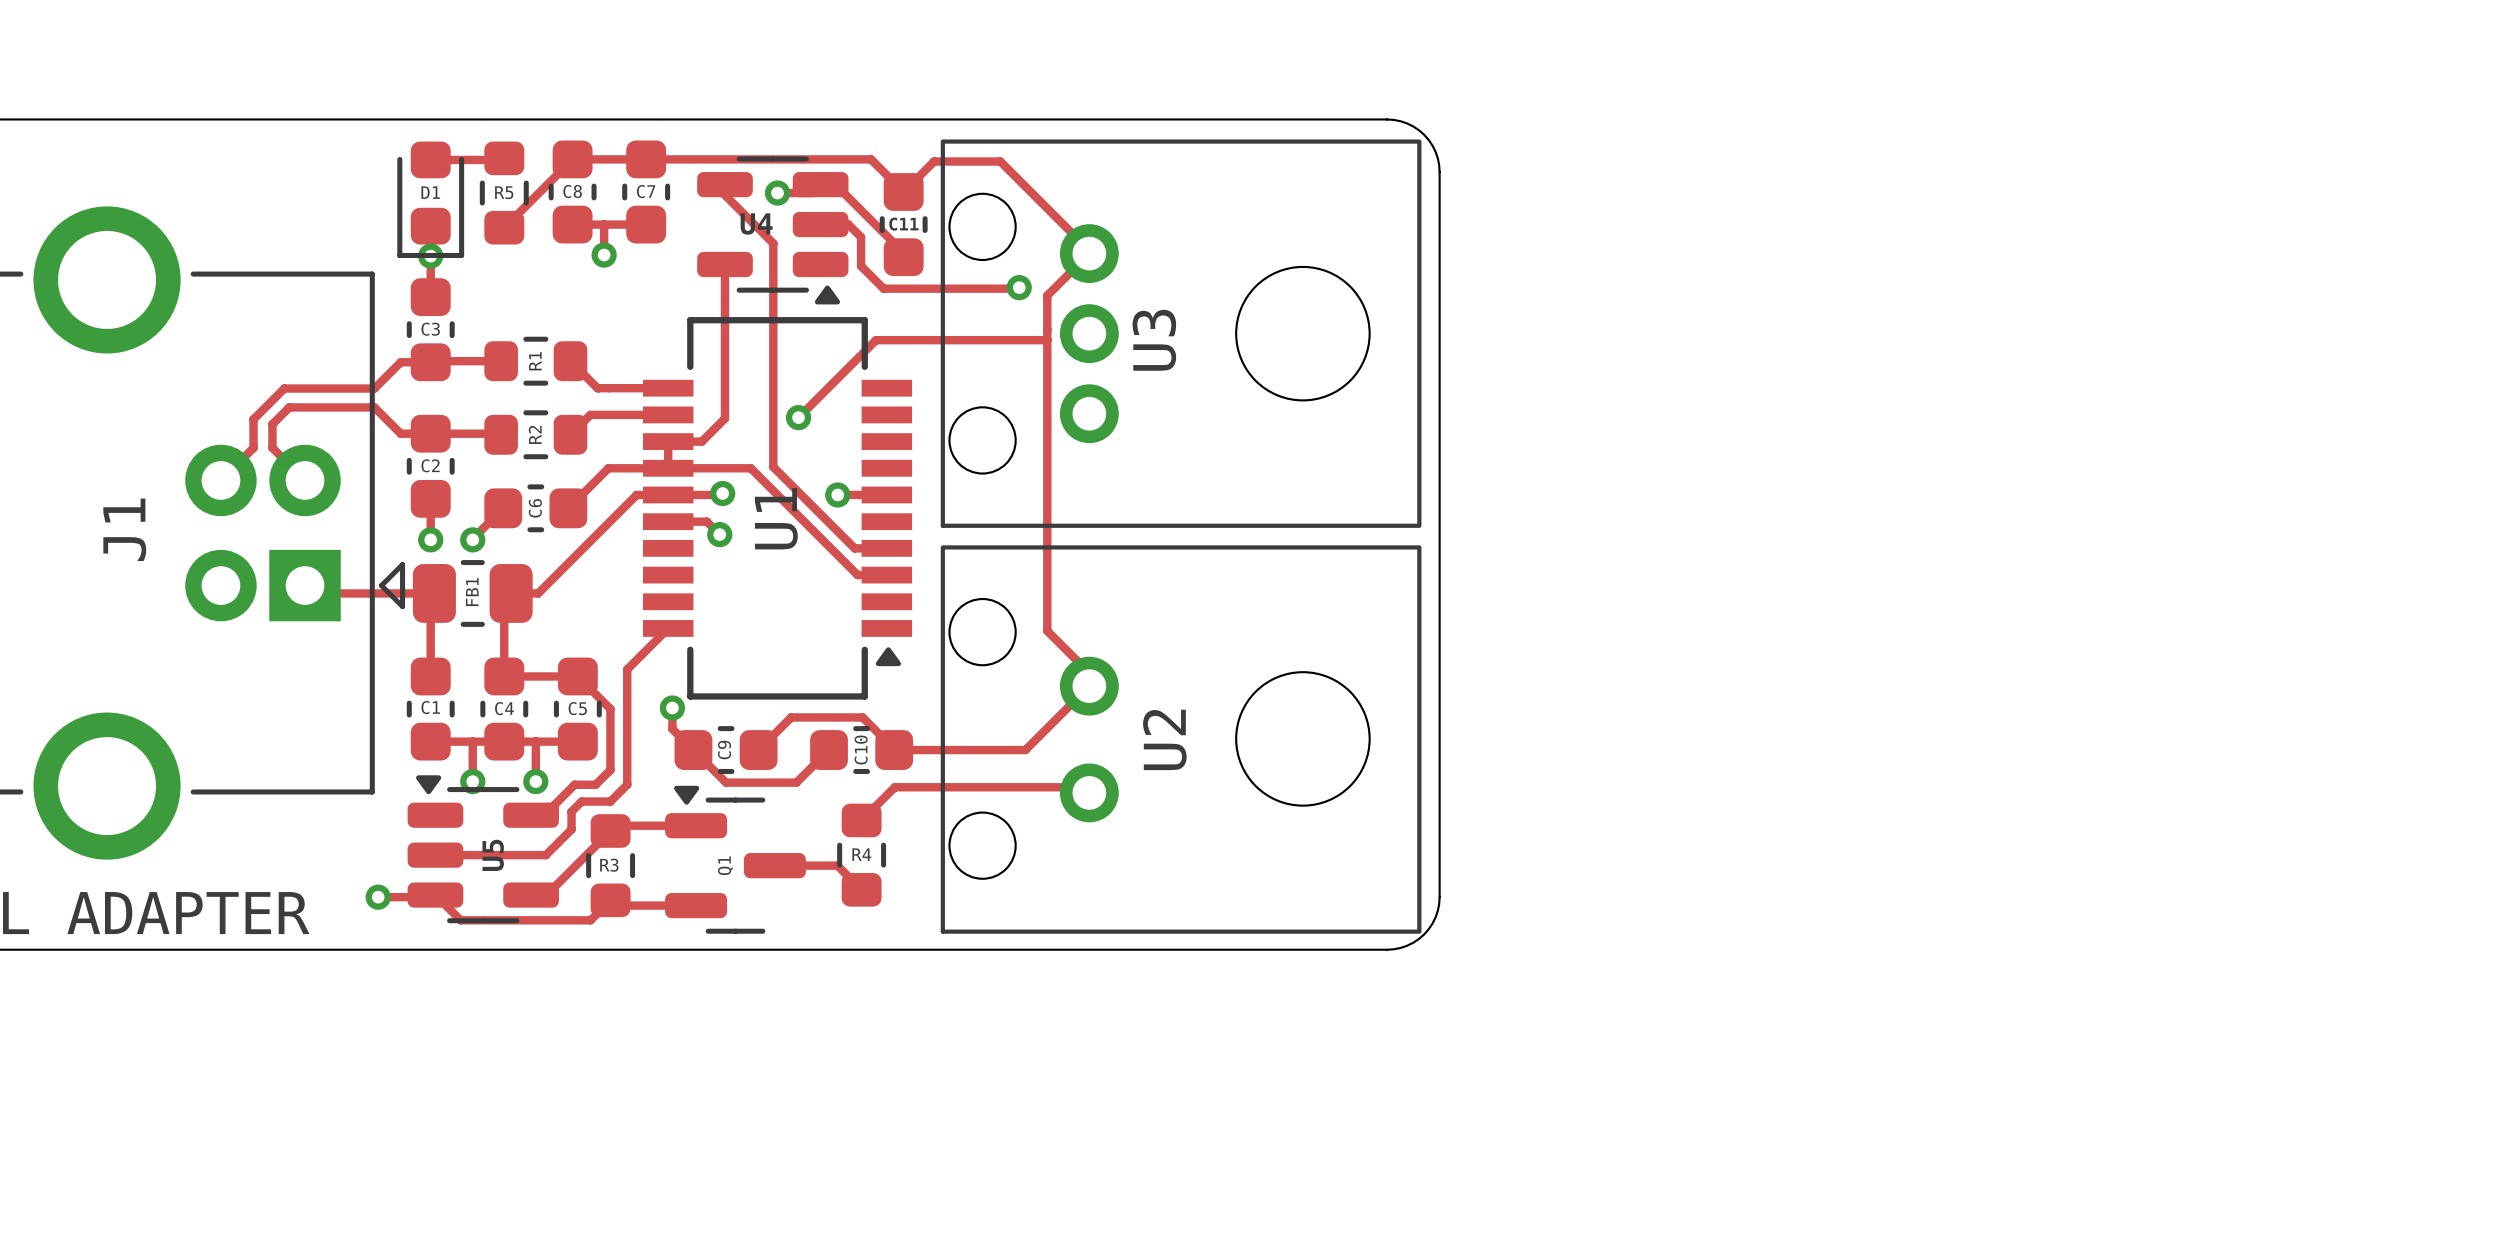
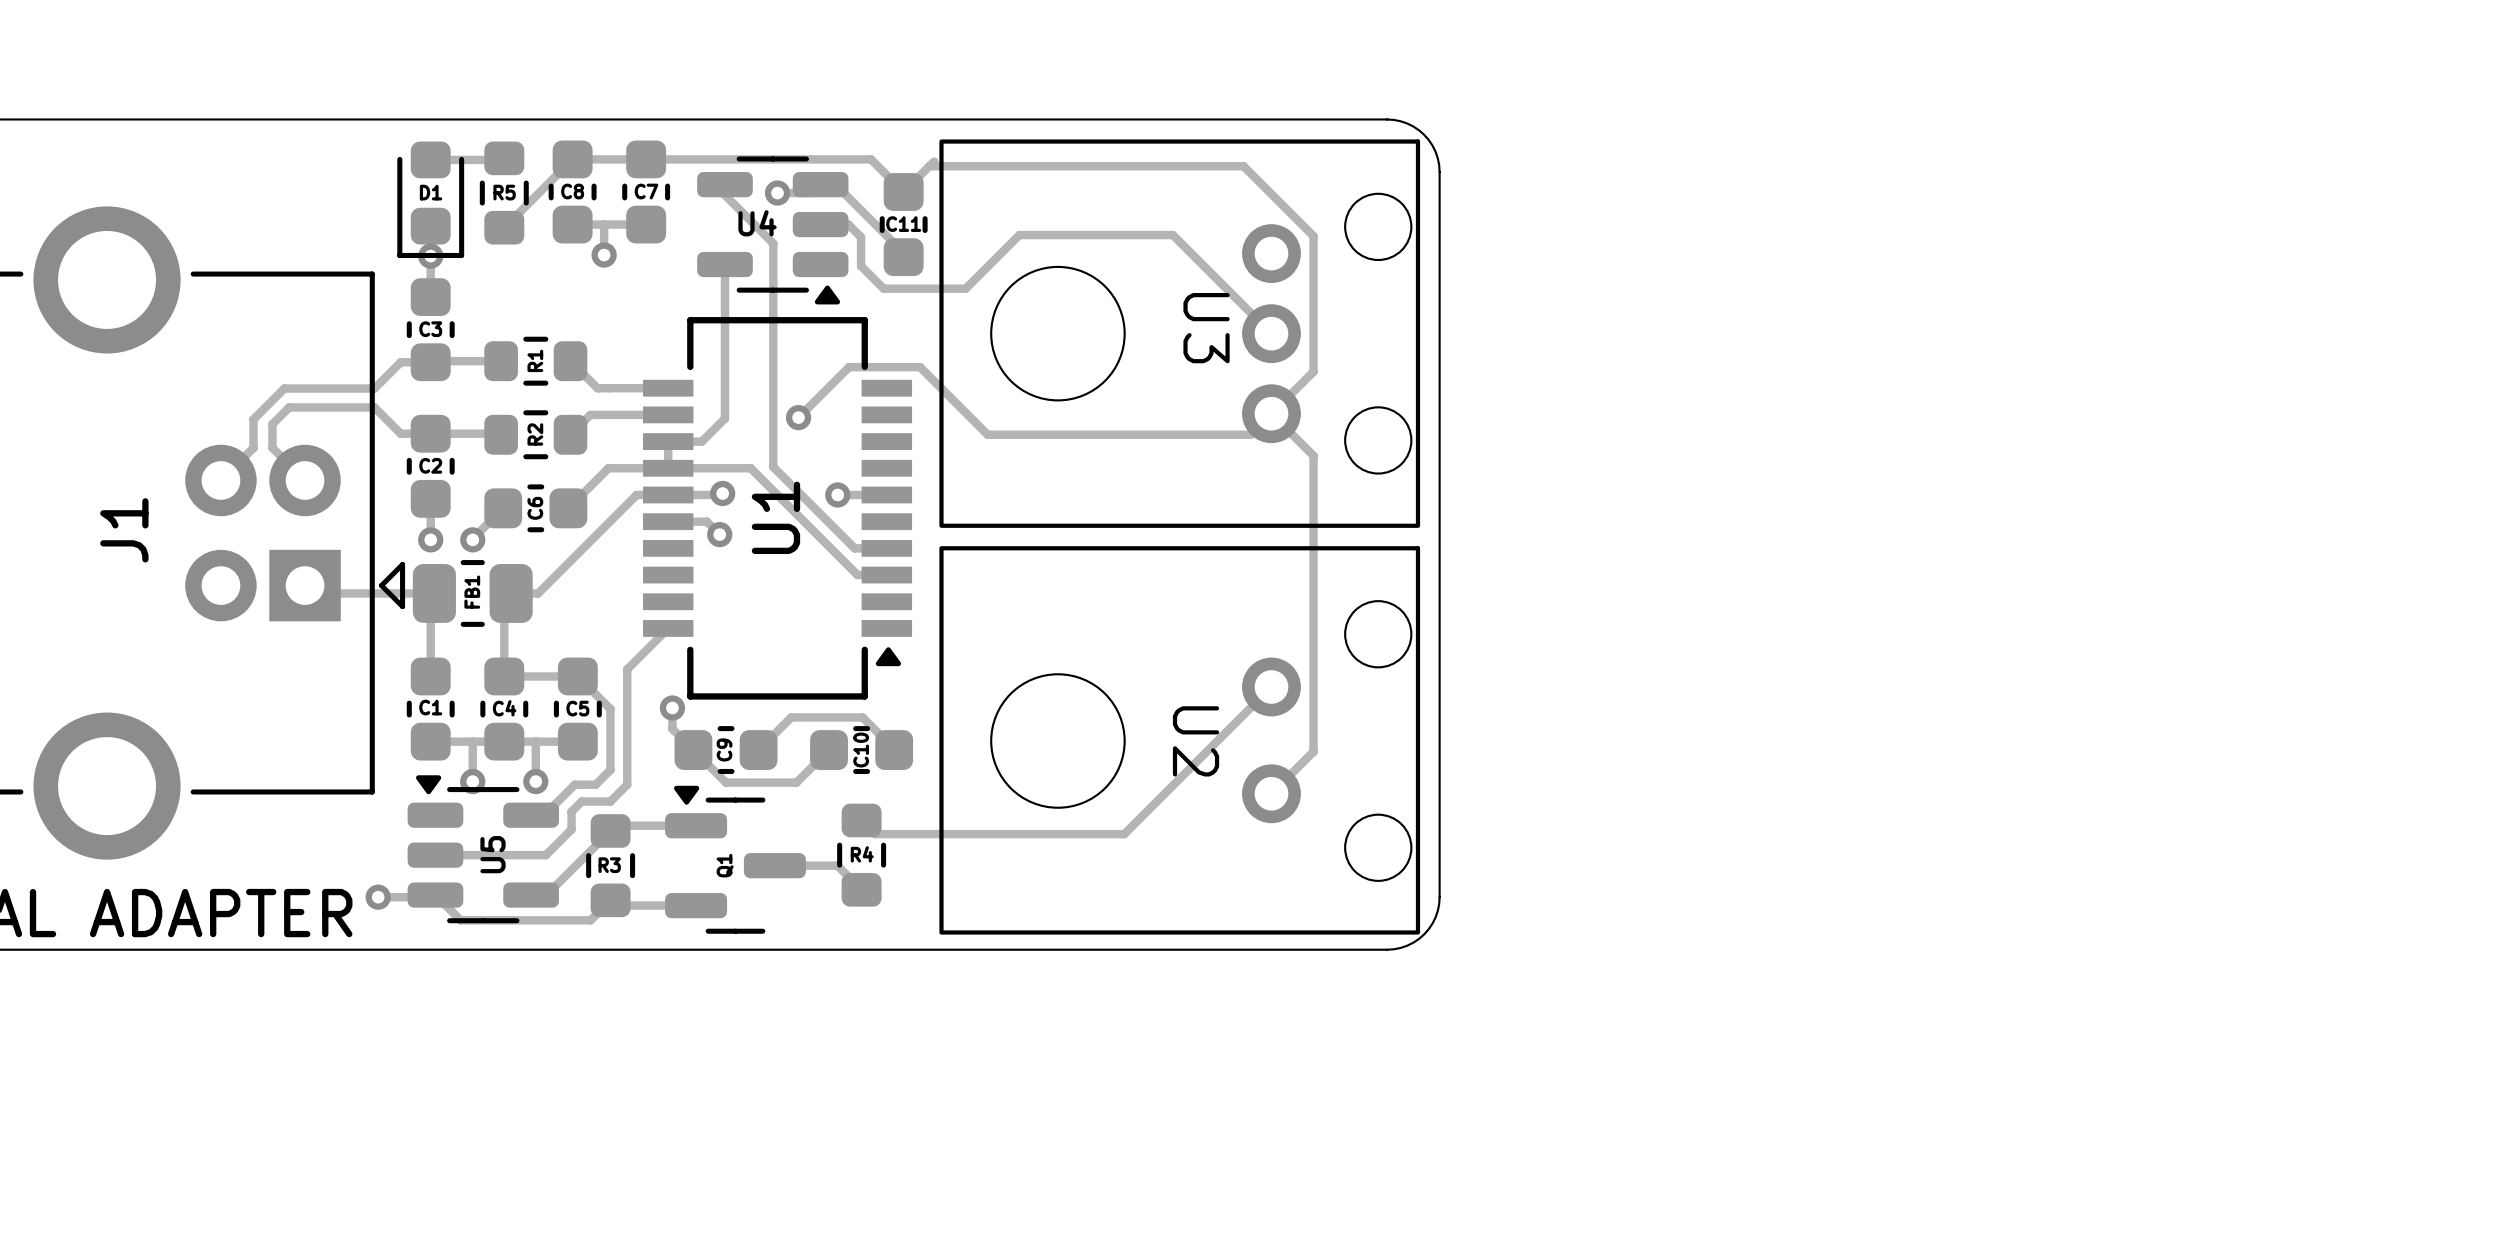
track: (934, 161) (1000, 161) (1089, 250) (1089, 253) (1047, 295) (1047, 630) (1089, 673) (1089, 686) (1025, 750) (895, 750) -> none
track: (1019, 287) (965, 288) -> (1271, 333) (1172, 235) (1019, 235) (965, 288)
via: (1019, 287) -> none
U3 rotation: 0° (1181, 333) -> 180° (1179, 333)
track: (1047, 340) (876, 340) (849, 367) -> (929, 166) (1243, 166) (1313, 236) (1313, 371) (1250, 434) (987, 434) (920, 367) (849, 367)
track: none -> (1271, 413) (1313, 455) (1313, 751) (1271, 793)
U2 rotation: 0° (1181, 739) -> 180° (1179, 740)
track: (1083, 787) (894, 787) (861, 820) -> (1271, 686) (1124, 834) (875, 834) (861, 820)

